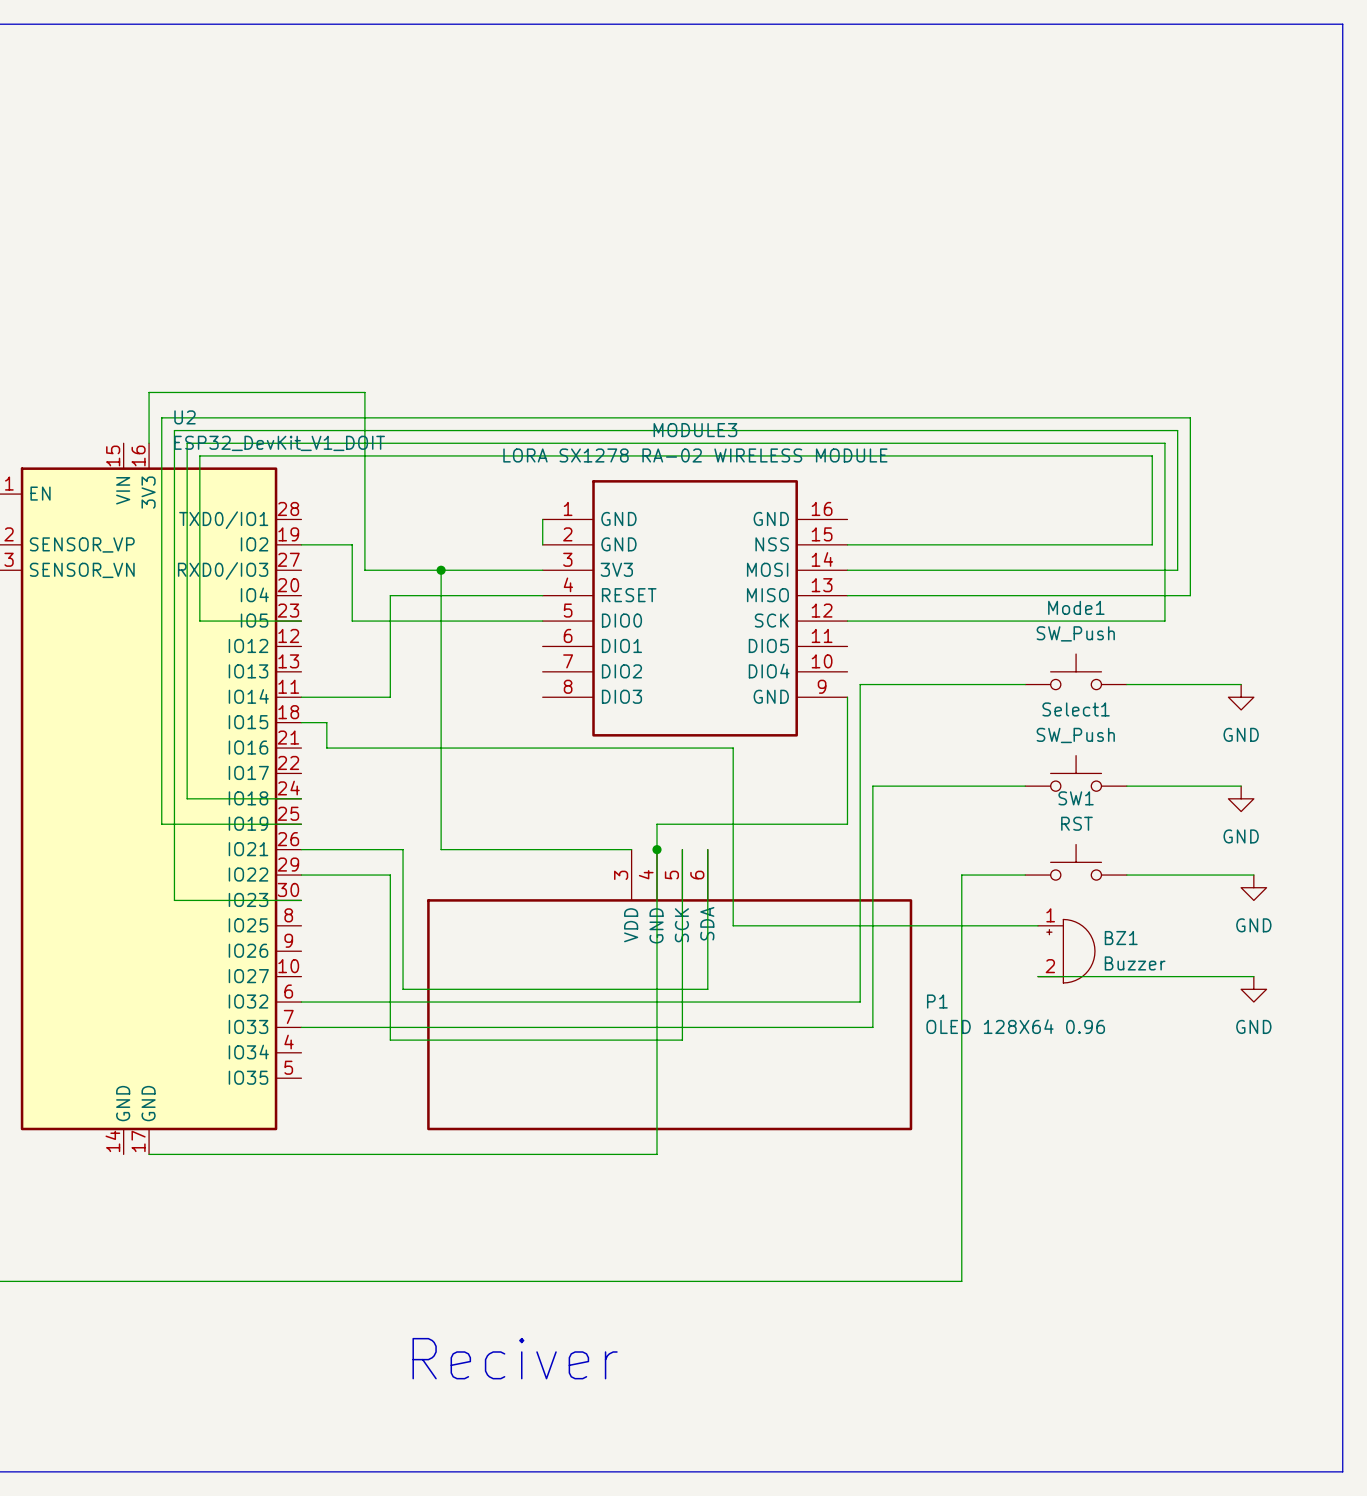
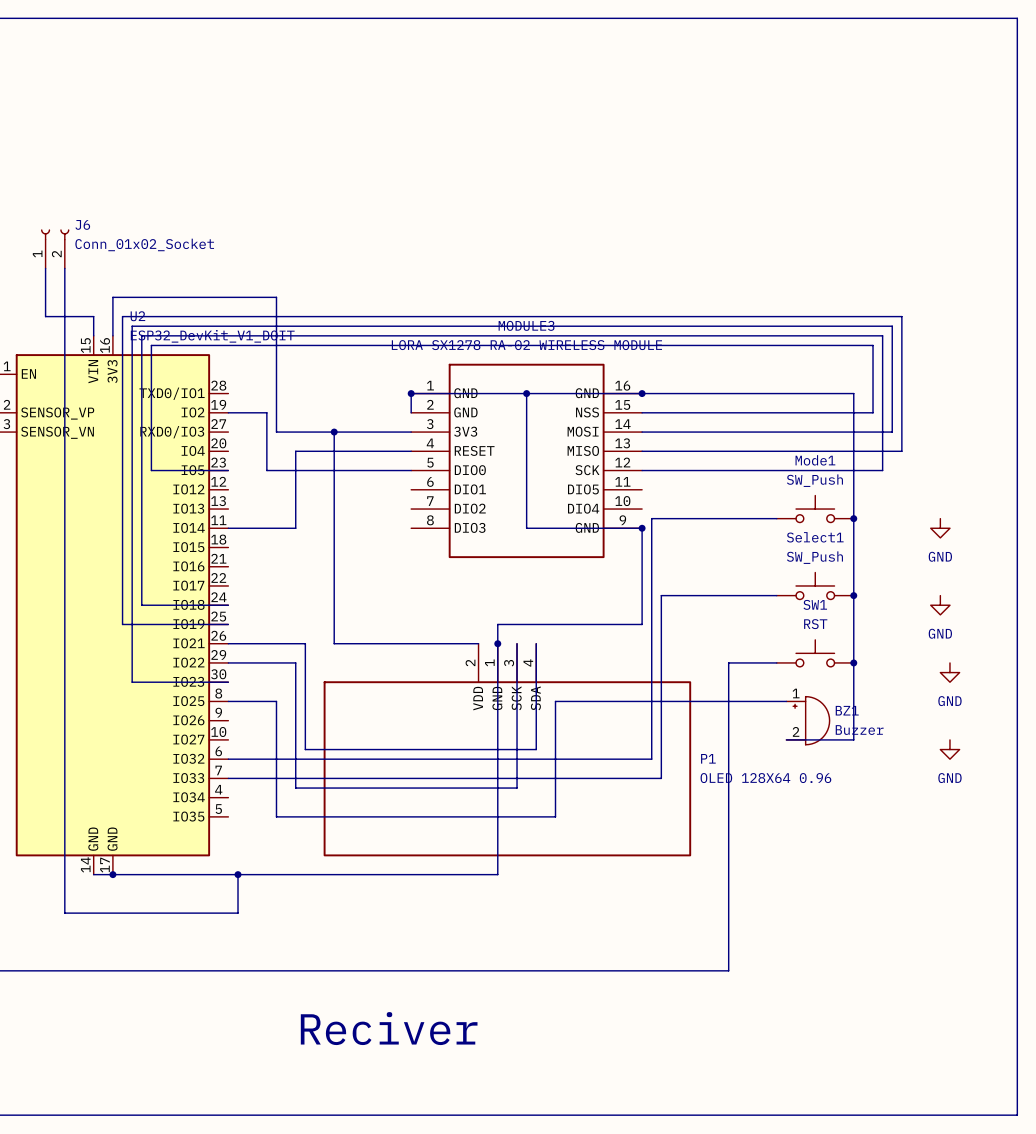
J6: none -> Conn_01x02_Socket (55, 248)
wire: none -> (45, 268) (45, 316) (93, 316) (93, 335)
wire: none -> (64, 268) (64, 913) (238, 913) (238, 874)
junction: none -> (411, 393)
wire: none -> (526, 393) (526, 528) (642, 528)
junction: none -> (526, 393)
junction: none -> (642, 393)
wire: (1126, 684) (1241, 684) -> none
junction: none -> (853, 518)
junction: none -> (642, 528)
wire: (301, 722) (326, 722) (326, 748) (733, 748) (733, 925) -> (228, 701) (276, 701) (276, 816) (555, 816) (555, 701)
wire: (1126, 786) (1241, 786) -> none
junction: none -> (853, 595)
P1 pin number: 4 (646, 874) -> 1 (489, 662)
P1 pin number: 3 (621, 875) -> 2 (470, 662)
P1 pin number: 5 (671, 875) -> 3 (509, 663)
P1 pin number: 6 (697, 875) -> 4 (528, 662)
wire: (1126, 875) (1253, 875) -> none
junction: none -> (853, 662)
wire: (1126, 976) (1253, 976) -> (853, 739) (853, 393) (411, 393)
wire: none -> (93, 874) (112, 874)
junction: none -> (112, 874)
junction: none -> (238, 874)

